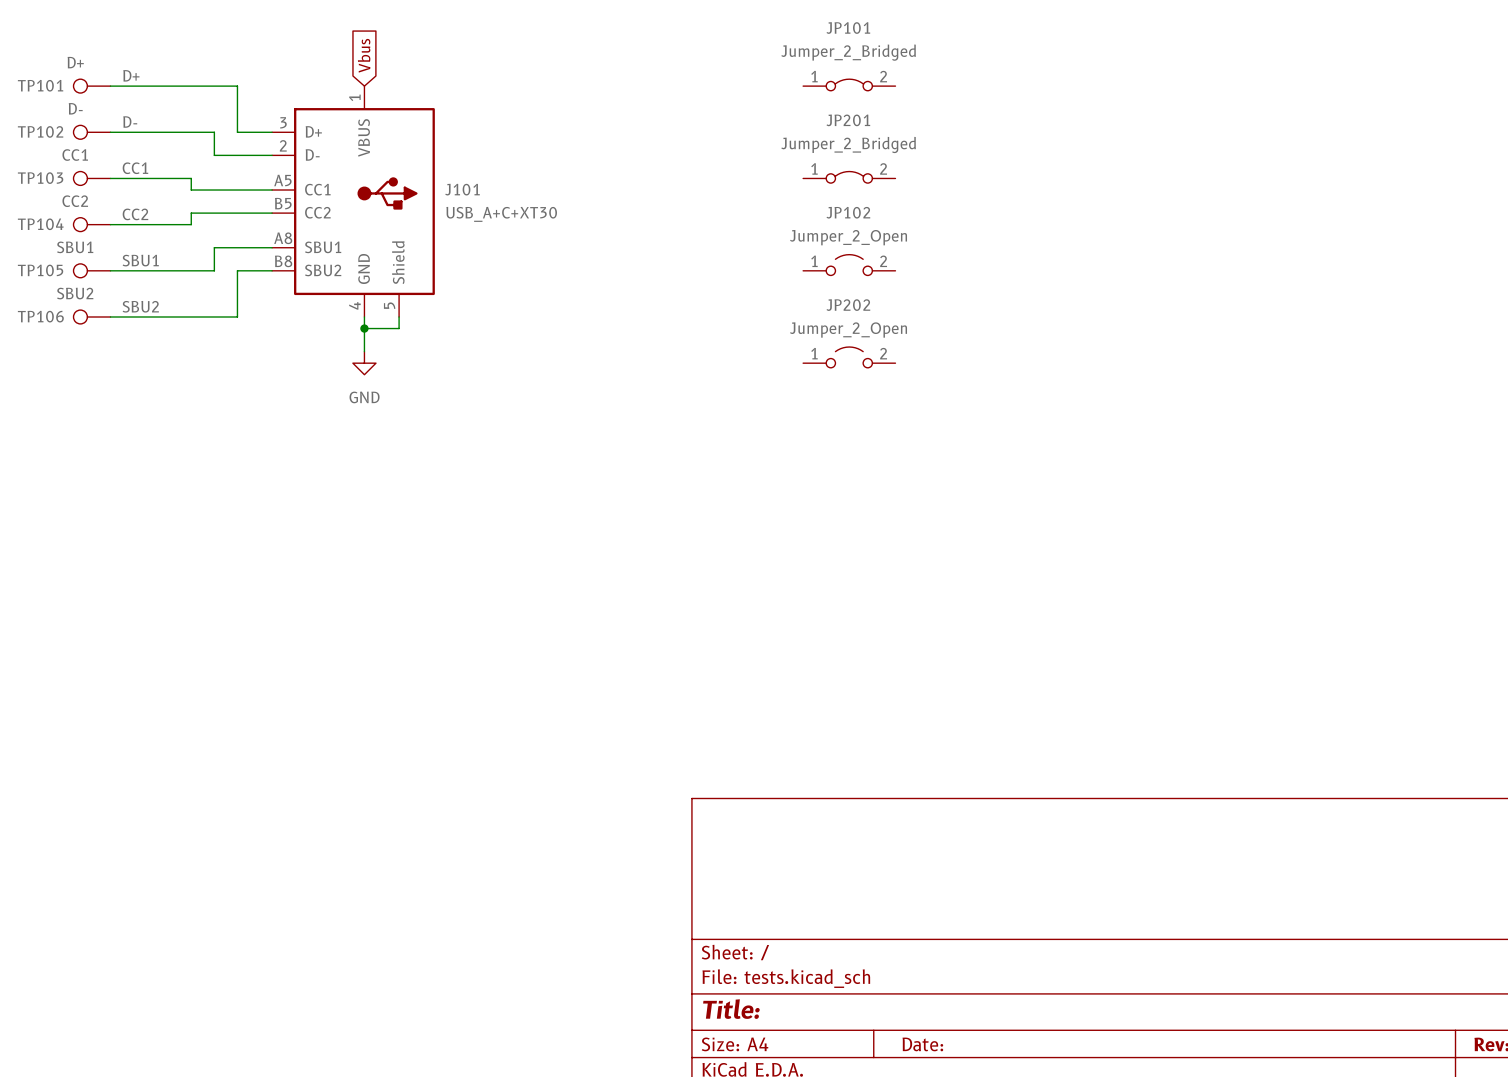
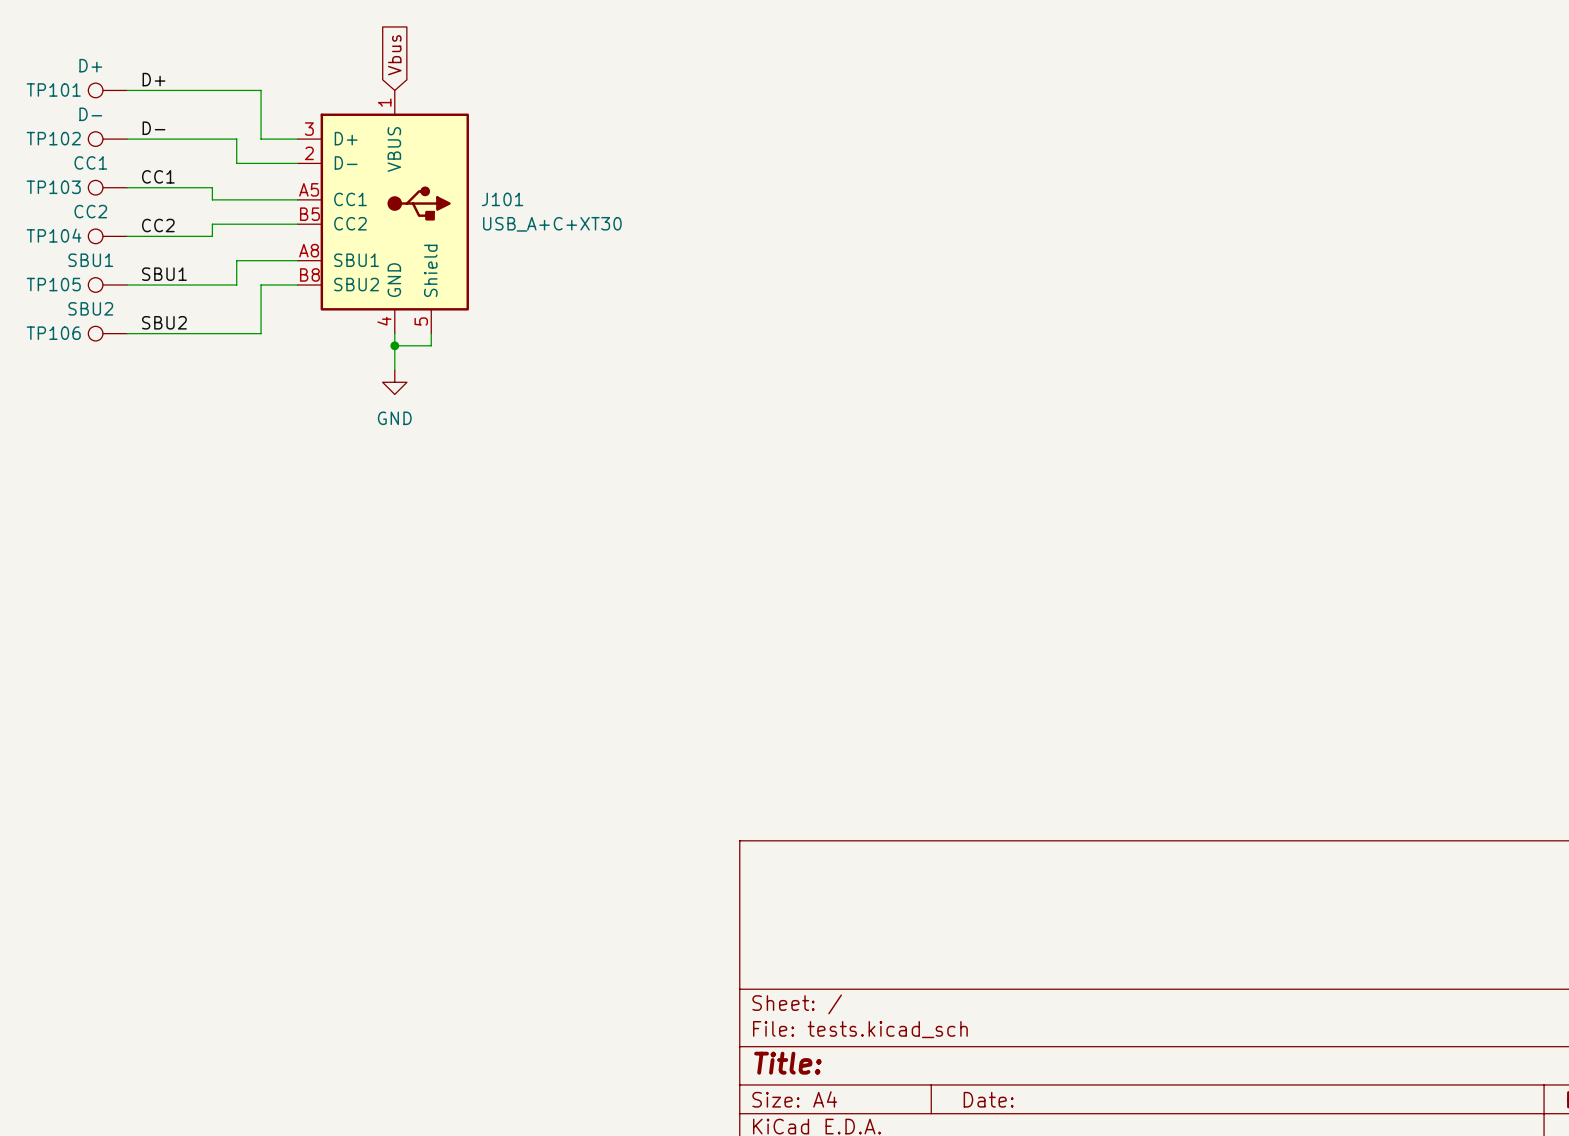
JP101: Jumper_2_Bridged (849, 84) -> none
JP201: Jumper_2_Bridged (849, 177) -> none
JP102: Jumper_2_Open (849, 265) -> none
JP202: Jumper_2_Open (849, 357) -> none

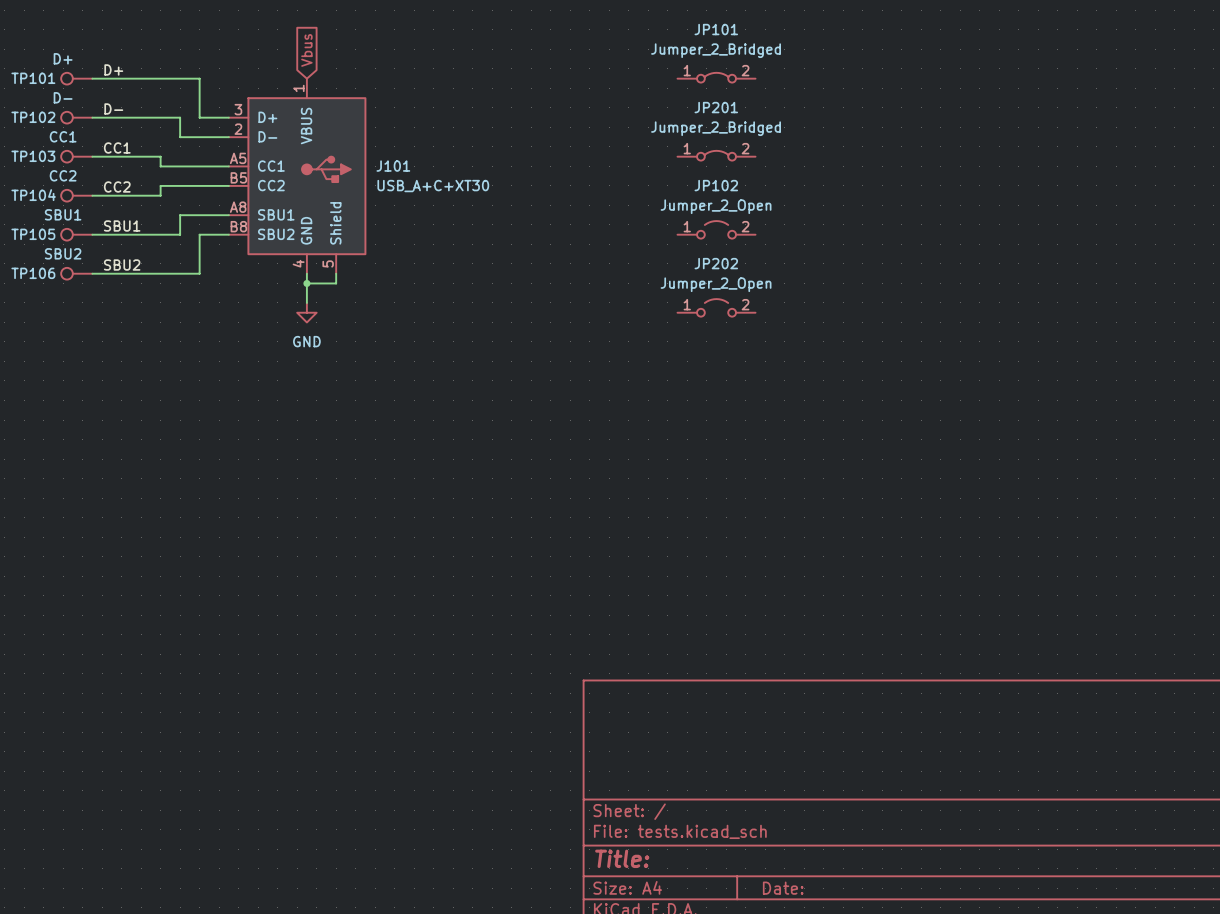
JP101: none -> Jumper_2_Bridged (716, 77)
JP201: none -> Jumper_2_Bridged (716, 155)
JP102: none -> Jumper_2_Open (716, 229)
JP202: none -> Jumper_2_Open (716, 307)

